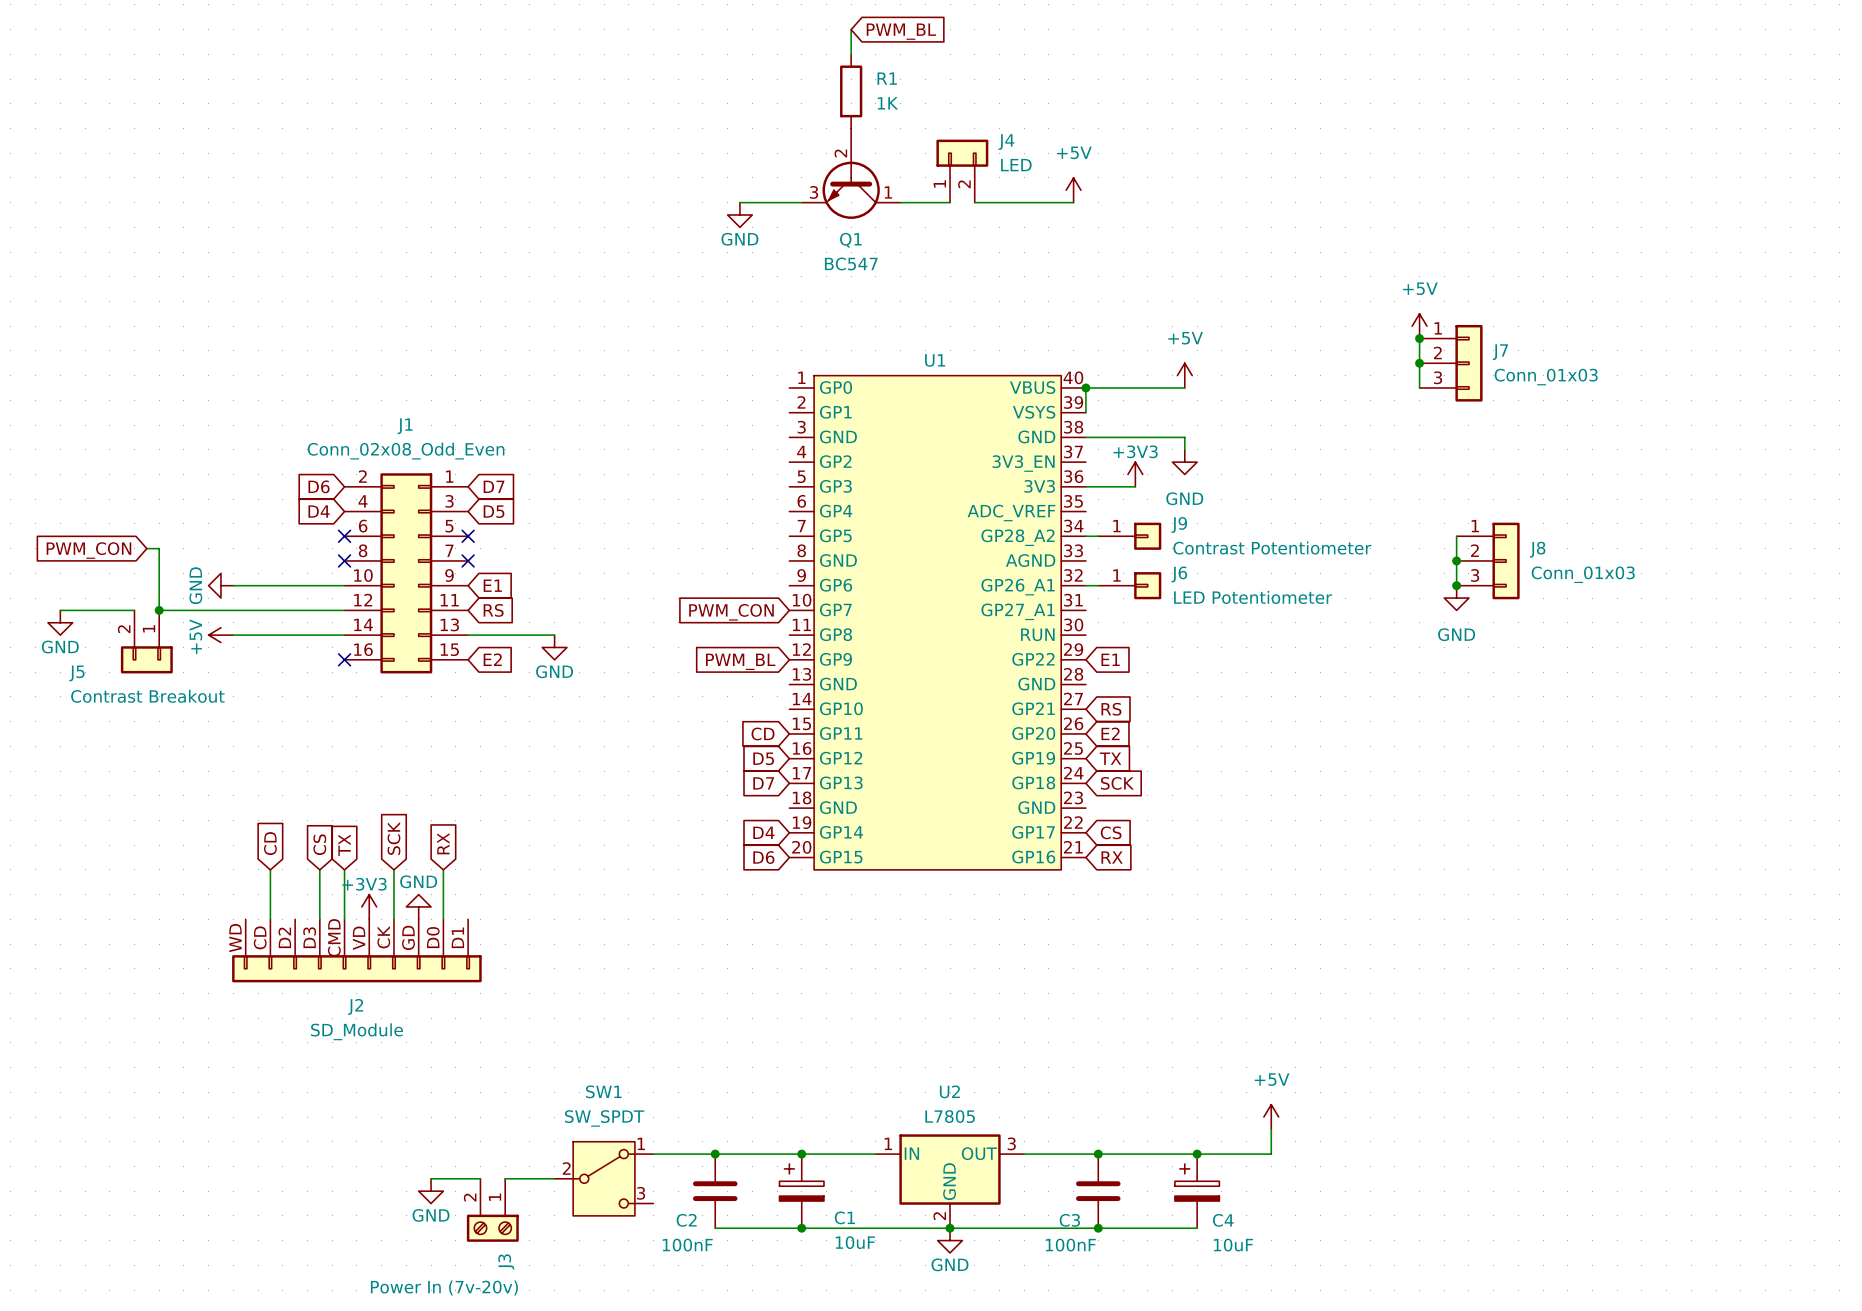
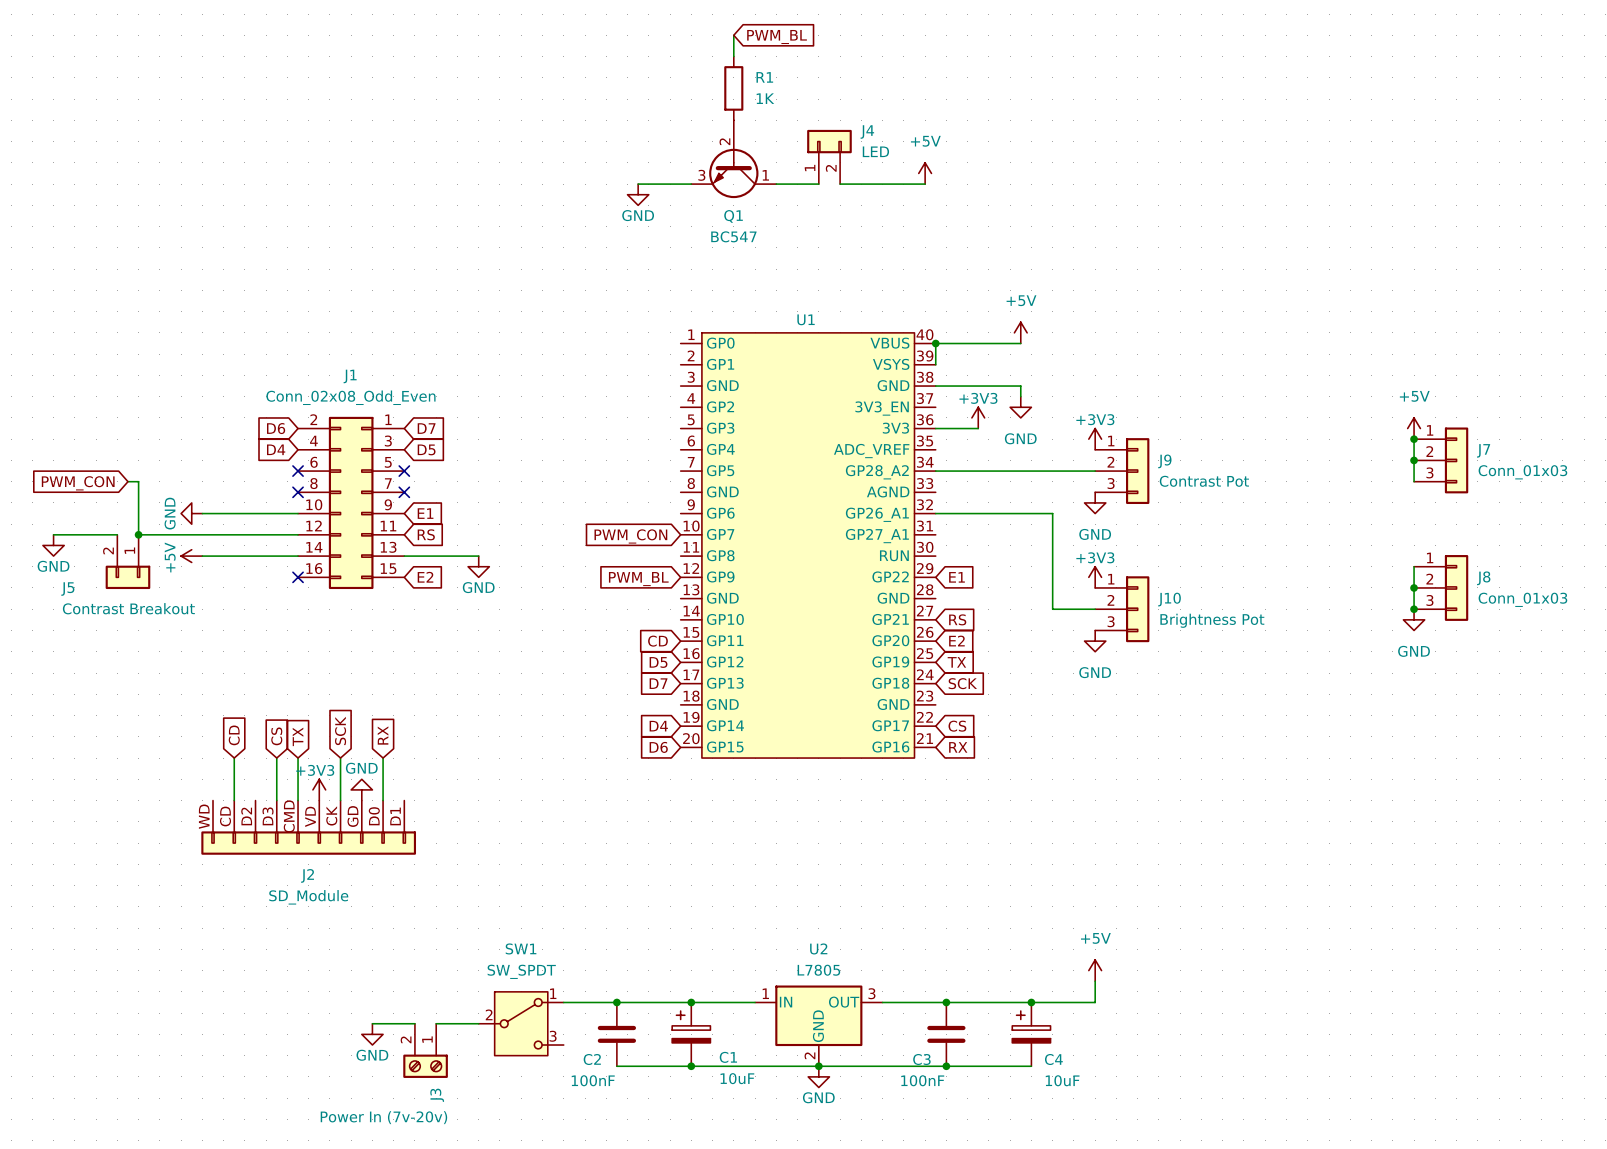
power symbol: +5V (1419, 326) -> none
wire: (1419, 338) (1419, 387) -> none
junction: (1419, 338) -> none
junction: (1419, 363) -> none
J7 position: (1451, 363) -> (1441, 460)
power symbol: none -> +5V (1414, 428)
power symbol: none -> +3V3 (1095, 439)
junction: none -> (1414, 439)
J9 symbol: [1098, 522, 1162, 550] -> [1095, 438, 1150, 505]
junction: none -> (1414, 460)
wire: none -> (946, 471) (1095, 471)
wire: (1456, 536) (1456, 585) -> (1414, 439) (1414, 481)
J9 value: Contrast Potentiometer (1272, 548) -> Contrast Pot (1204, 481)
junction: (1456, 560) -> none
J8 position: (1488, 560) -> (1441, 587)
power symbol: none -> GND (1095, 502)
wire: none -> (946, 513) (1052, 513) (1052, 609) (1095, 609)
J6: LED Potentiometer (1129, 585) -> none
junction: (1456, 585) -> none
power symbol: GND (1456, 598) -> none
wire: none -> (1414, 566) (1414, 609)
power symbol: none -> +3V3 (1095, 577)
junction: none -> (1414, 587)
J10: none -> Brightness Pot (1122, 609)
junction: none -> (1414, 609)
power symbol: none -> GND (1414, 619)
power symbol: none -> GND (1095, 641)

